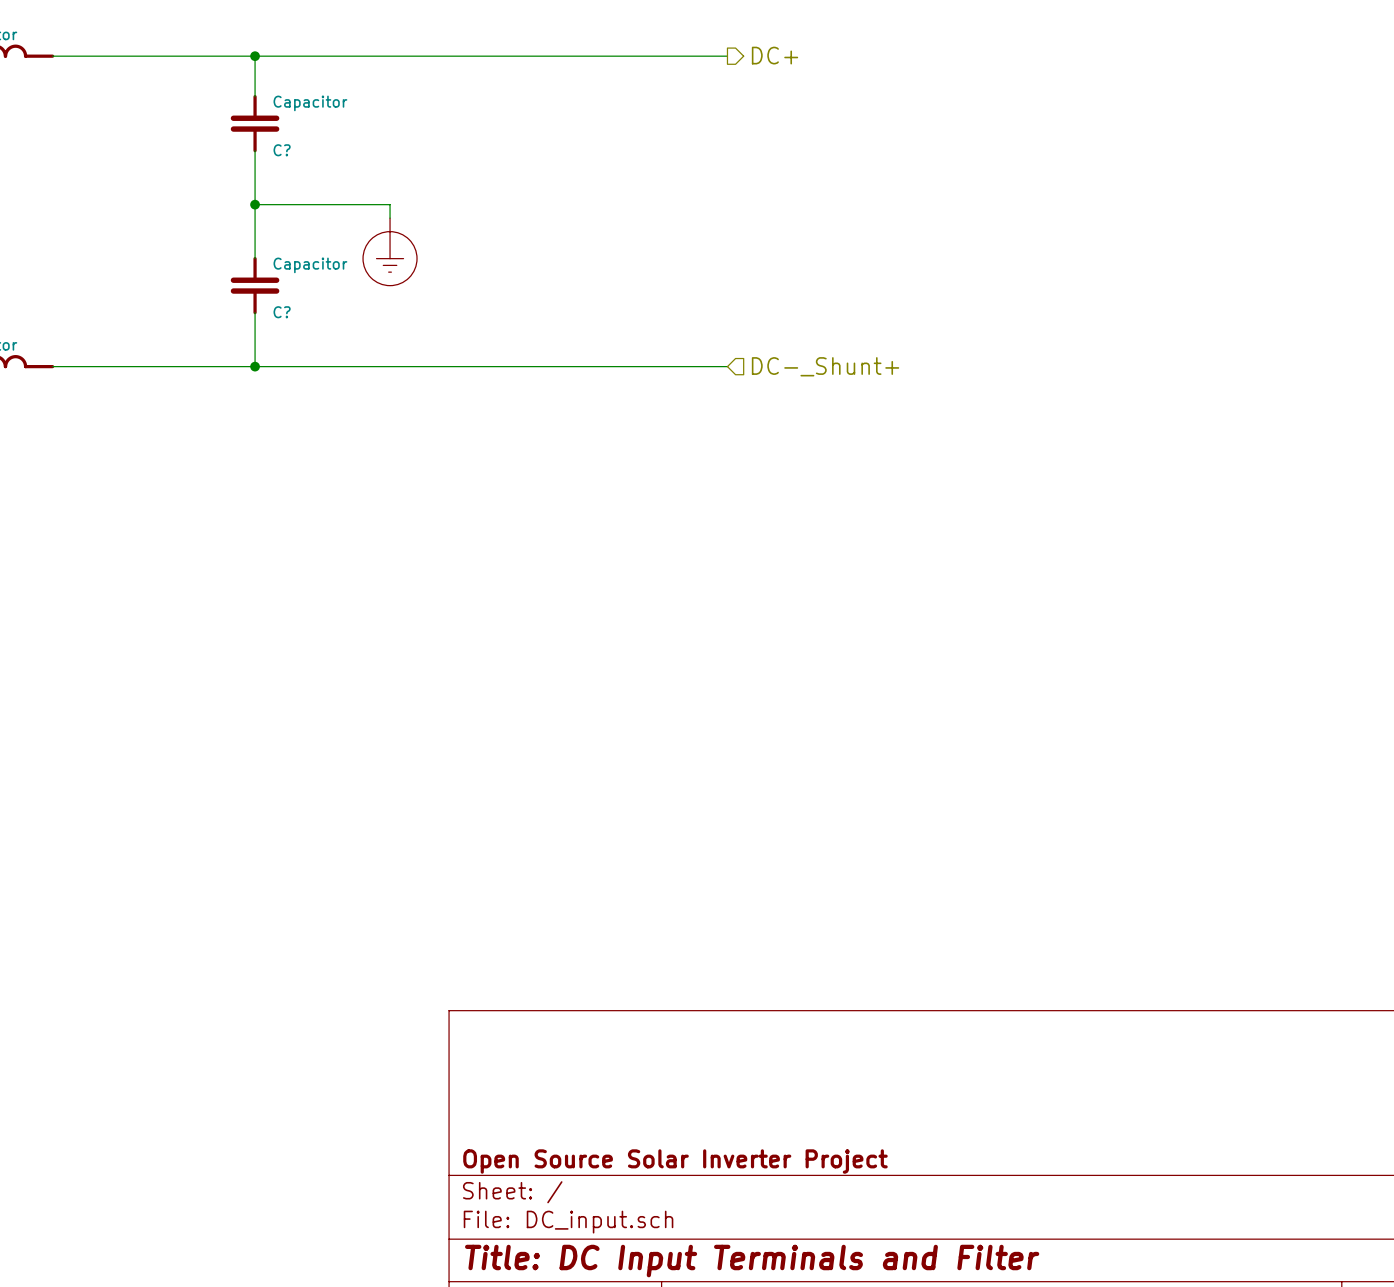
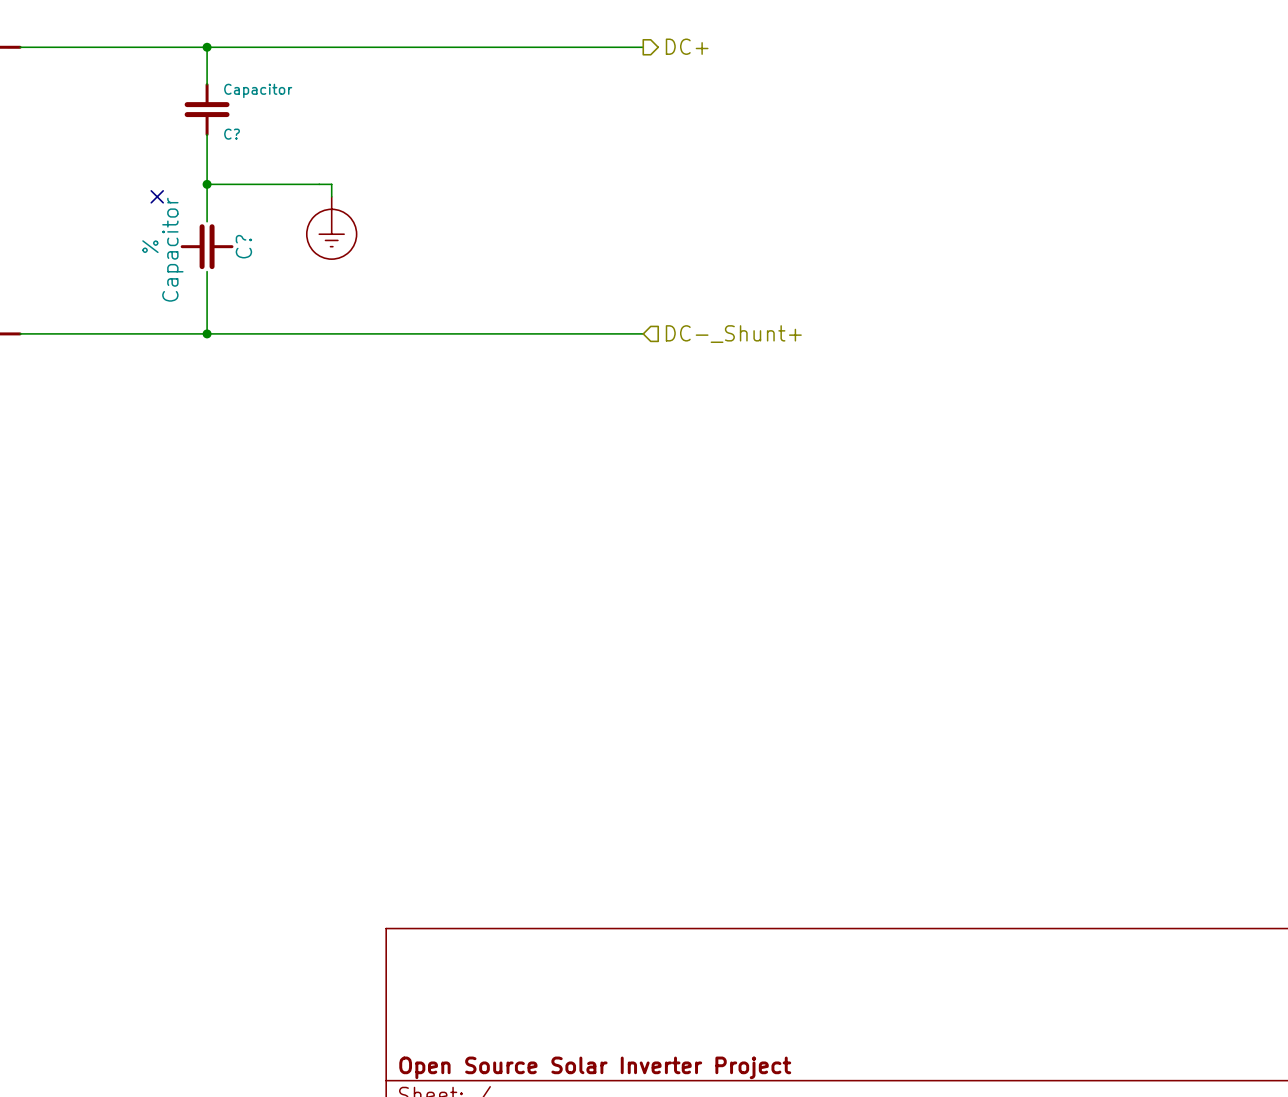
no-connect mark: none -> (157, 196)
C?: none -> Capacitor (207, 246)
C?: Capacitor (255, 285) -> none

